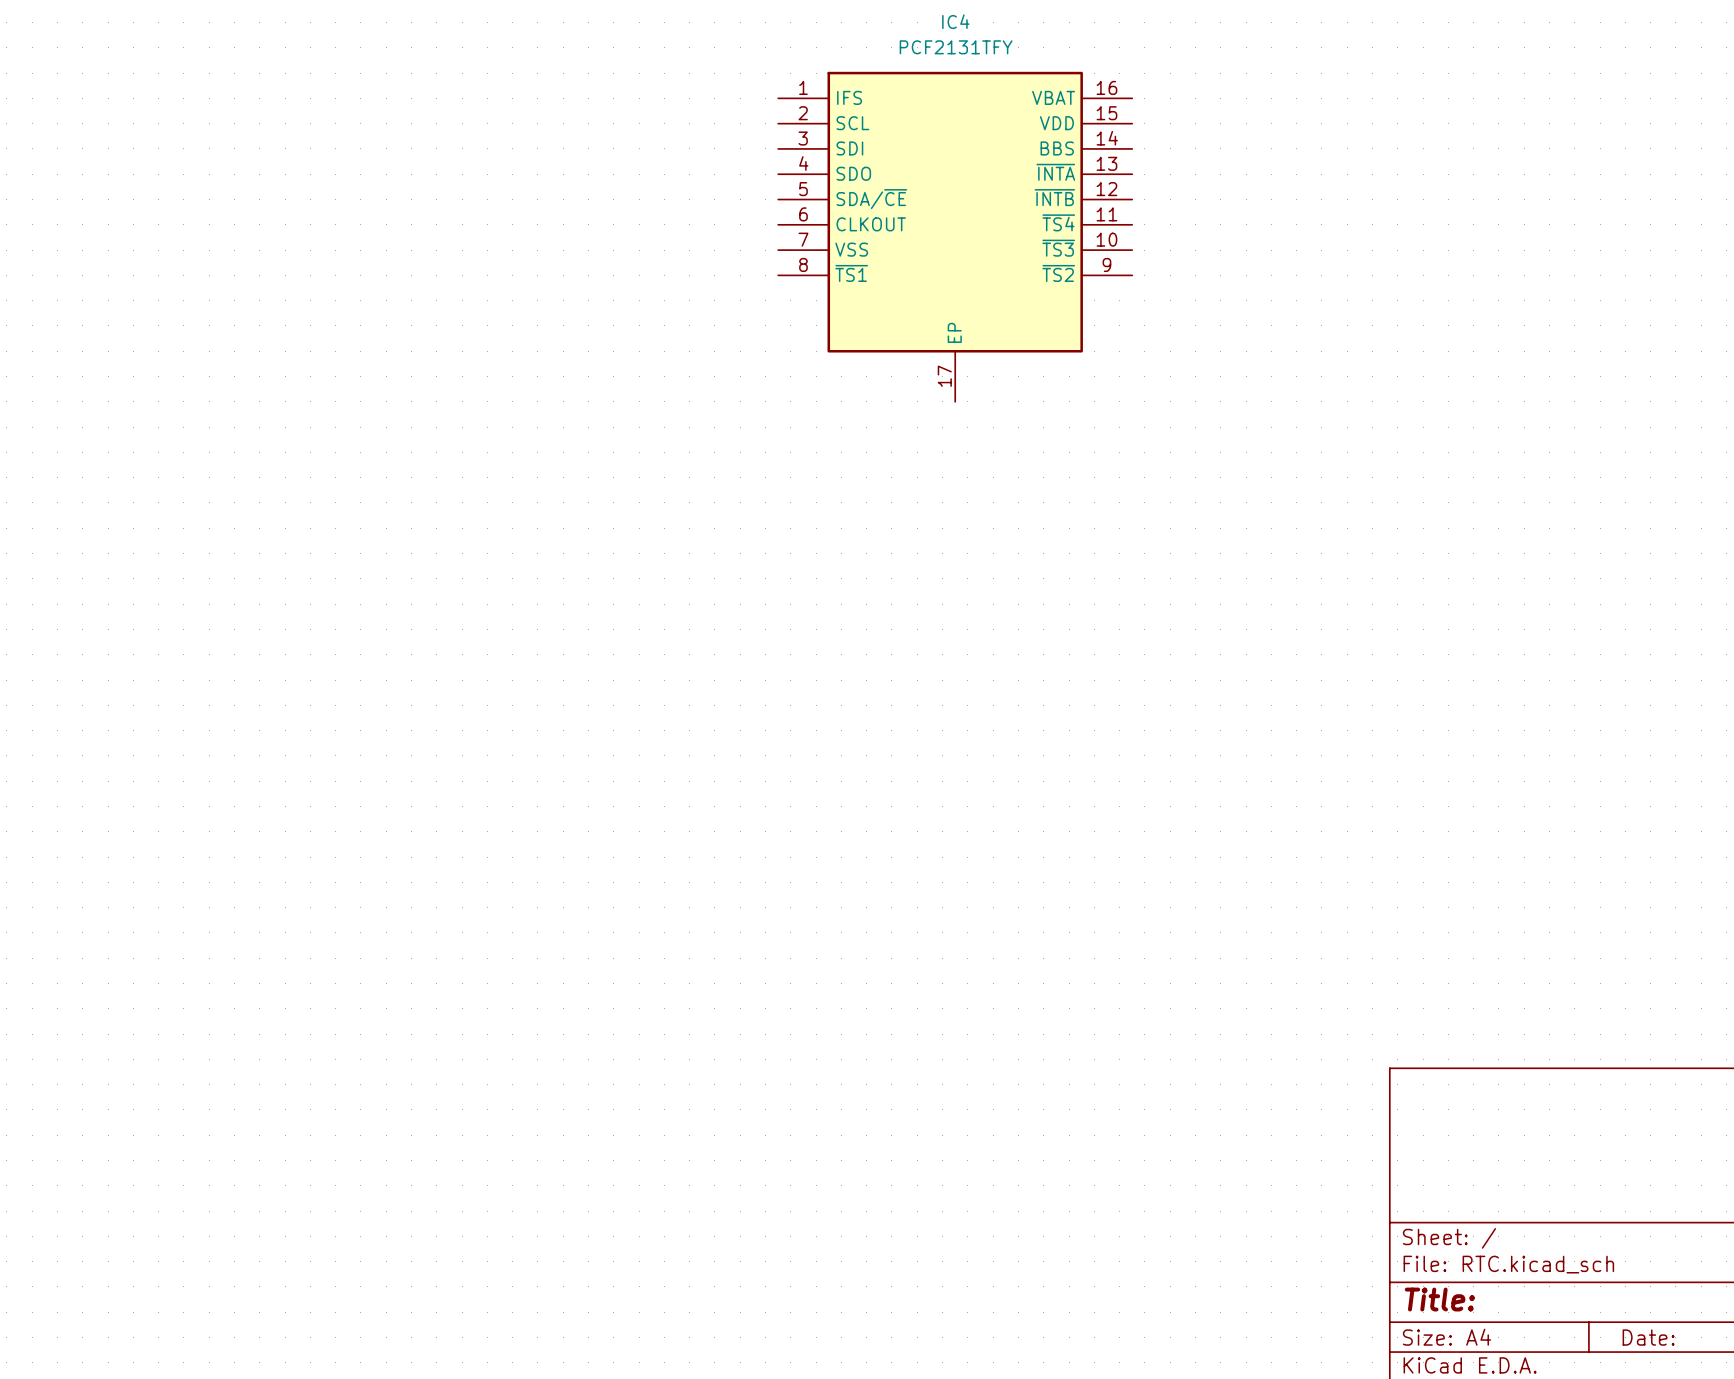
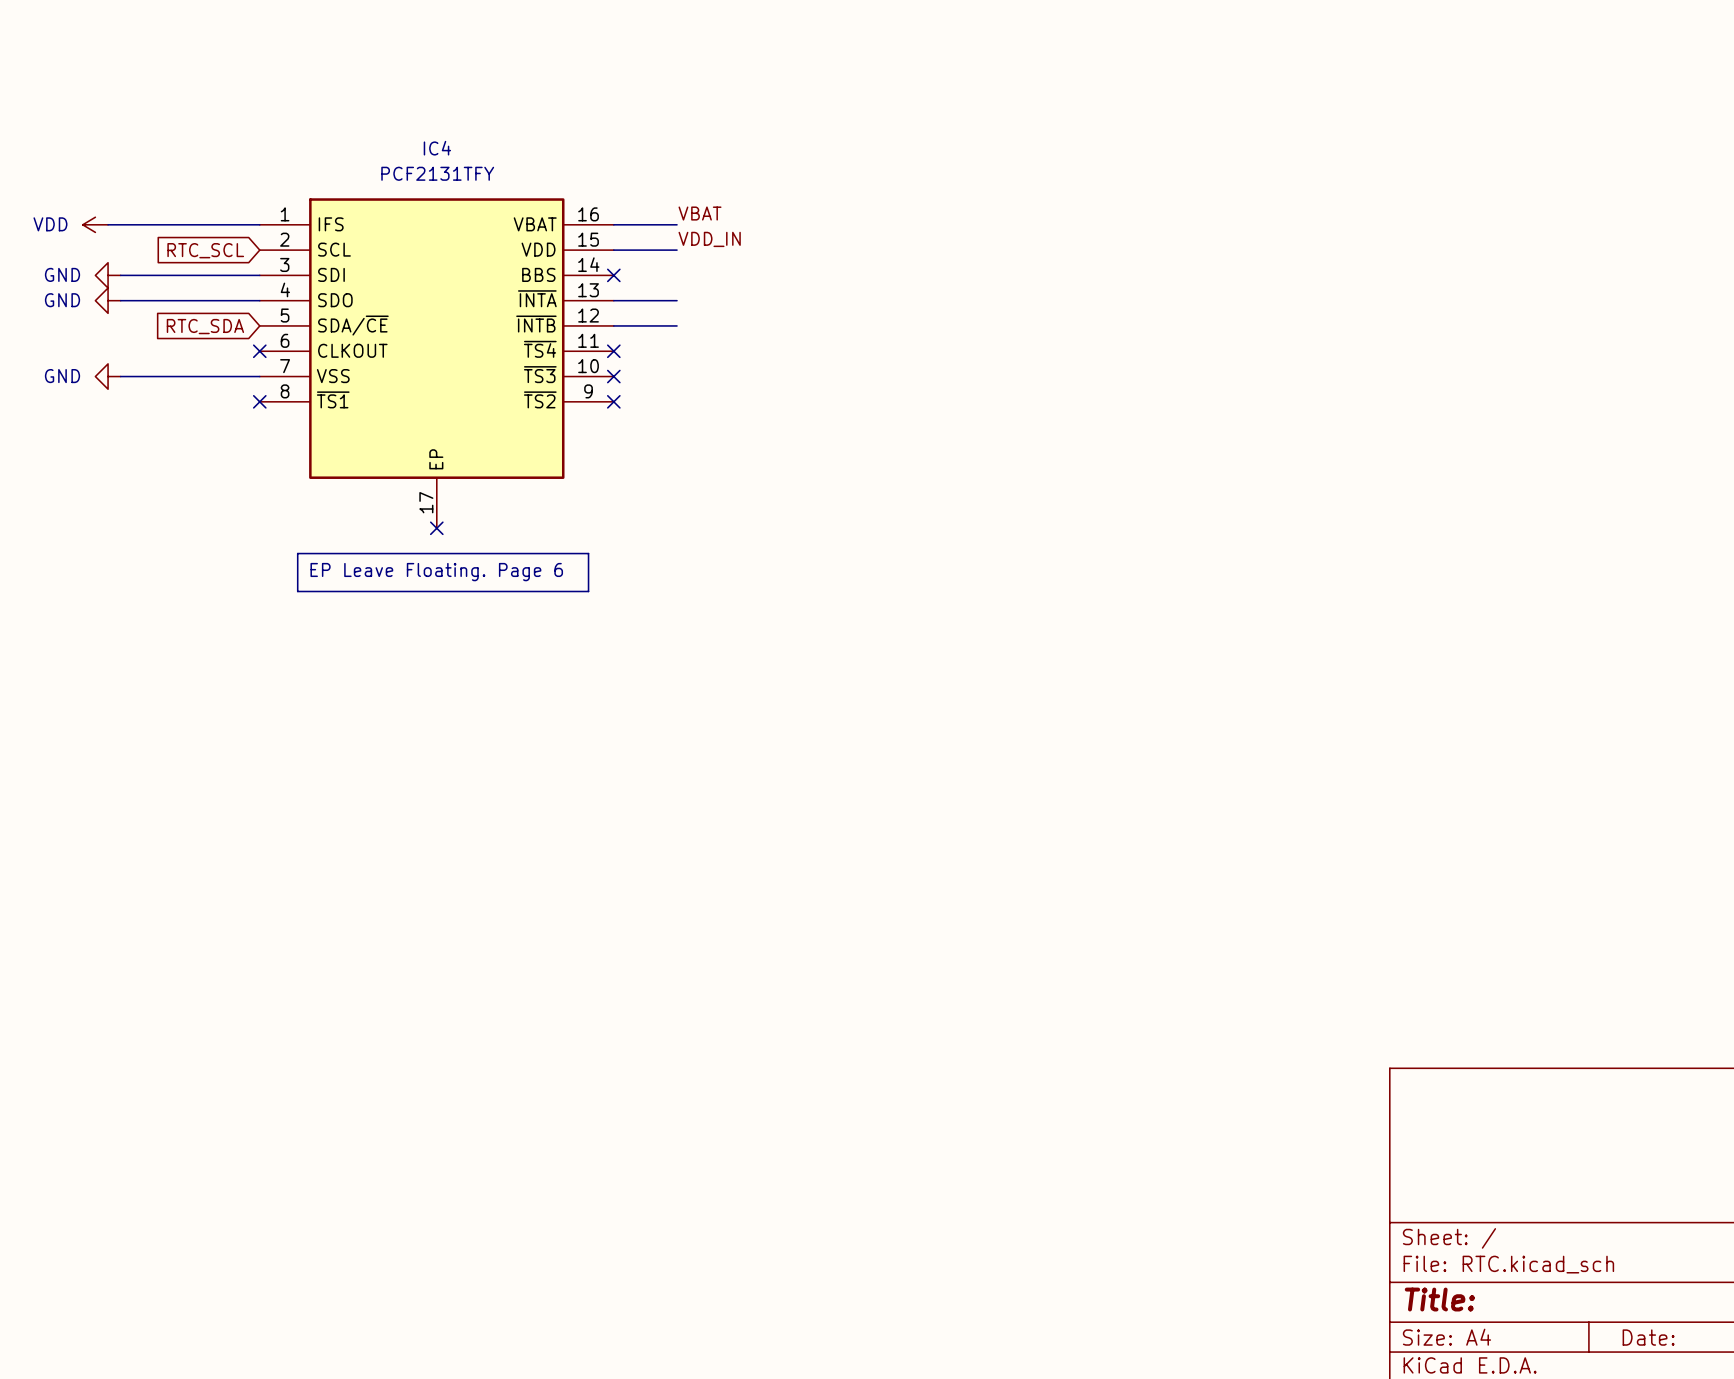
label: none -> VBAT (700, 213)
power symbol: none -> VDD (95, 224)
wire: none -> (108, 224) (259, 224)
wire: none -> (613, 224) (677, 224)
IC4 position: (955, 236) -> (436, 363)
label: none -> VDD_IN (709, 239)
global label: none -> RTC_SCL (205, 250)
wire: none -> (613, 250) (677, 250)
power symbol: none -> GND (108, 275)
wire: none -> (120, 275) (259, 275)
no-connect mark: none -> (613, 275)
power symbol: none -> GND (108, 300)
wire: none -> (120, 300) (259, 300)
wire: none -> (613, 300) (677, 300)
wire: none -> (613, 325) (677, 325)
global label: none -> RTC_SDA (205, 326)
no-connect mark: none -> (259, 351)
no-connect mark: none -> (613, 351)
power symbol: none -> GND (108, 376)
wire: none -> (120, 376) (259, 376)
no-connect mark: none -> (613, 376)
no-connect mark: none -> (259, 401)
no-connect mark: none -> (613, 401)
no-connect mark: none -> (436, 528)
line: none -> (297, 553) (588, 553) (588, 591) (297, 591) (297, 553)
text: none -> EP Leave Floating. Page 6 (436, 572)

